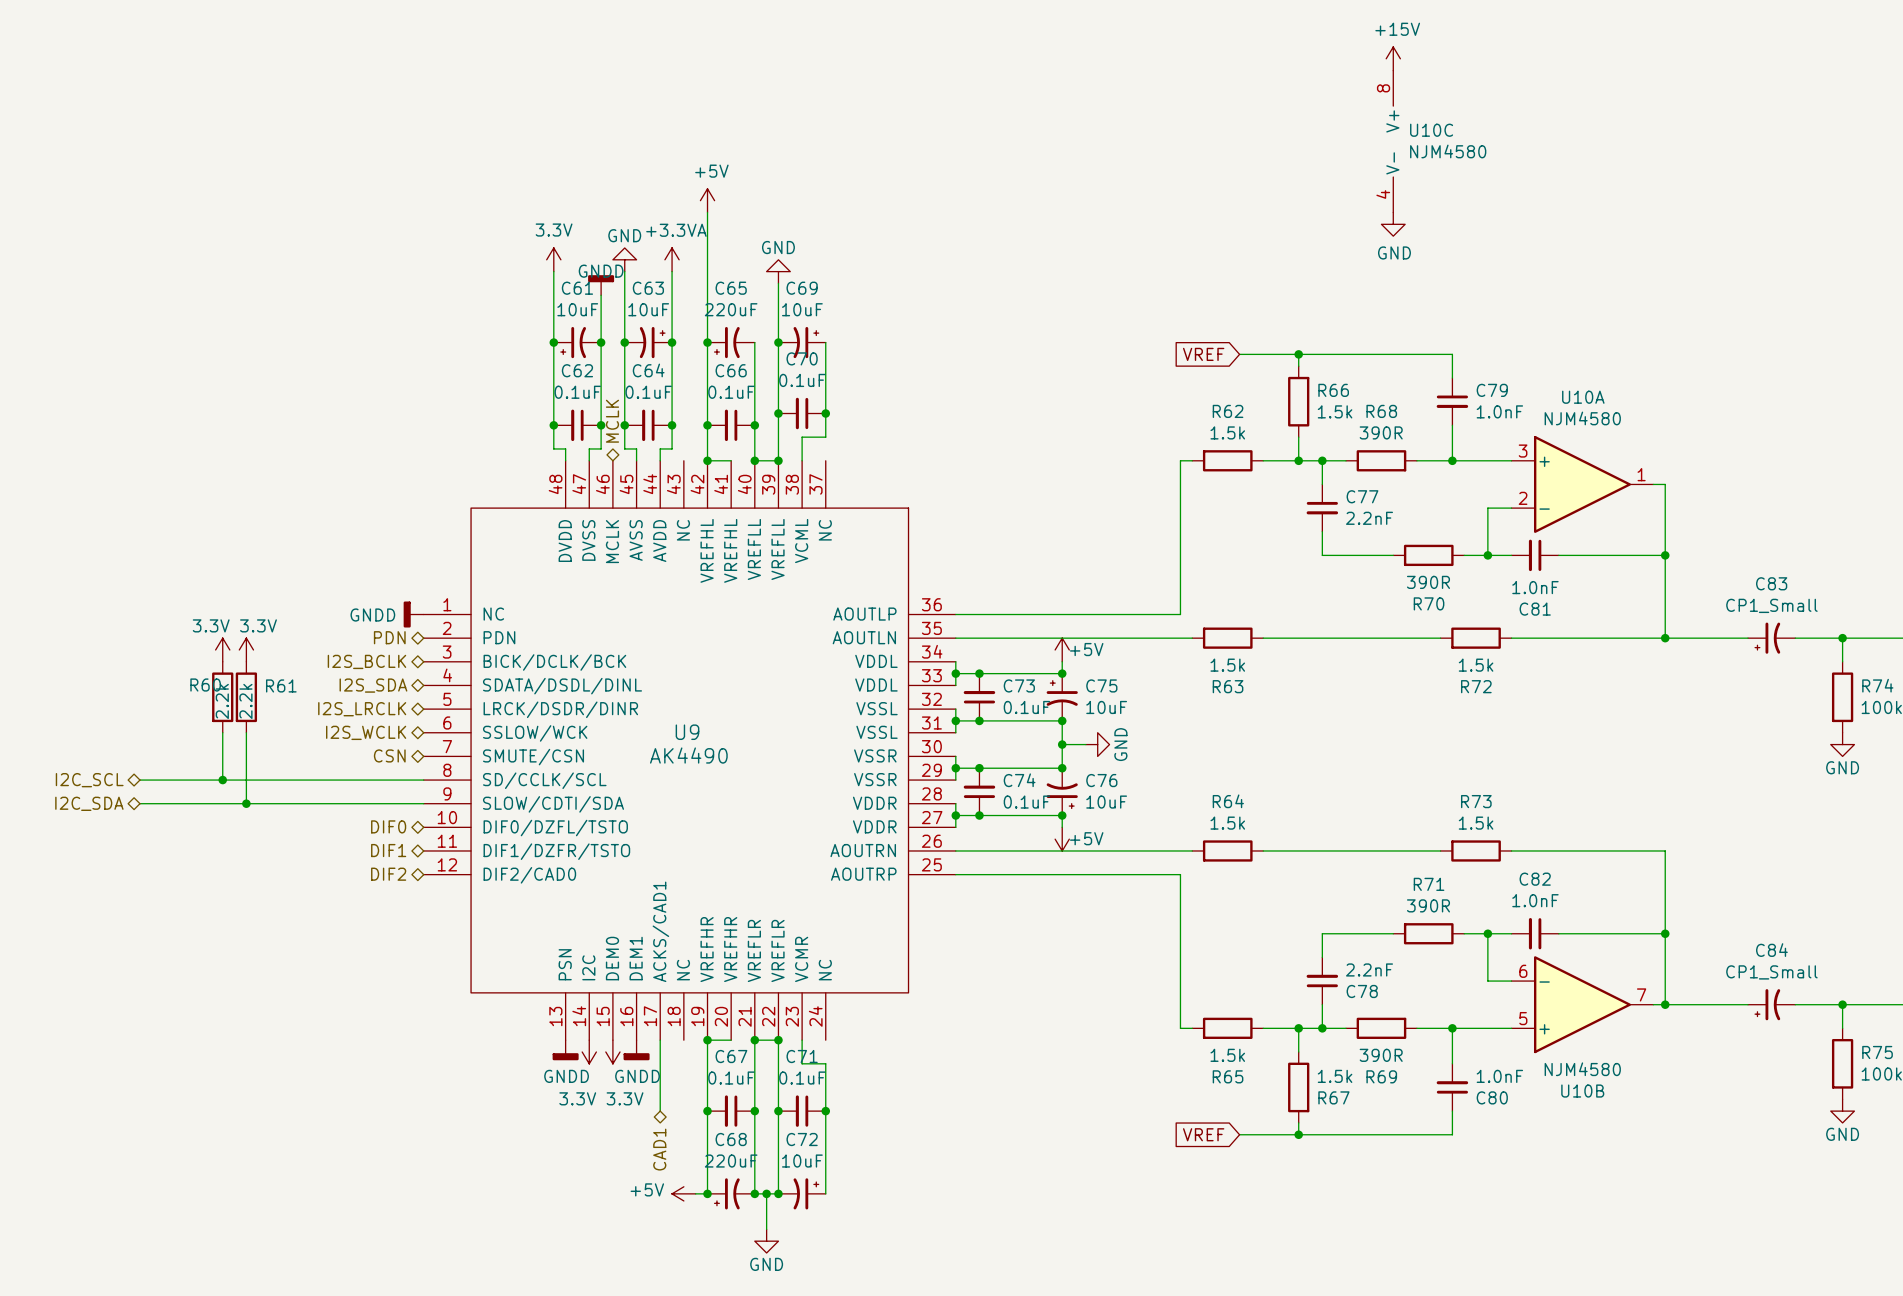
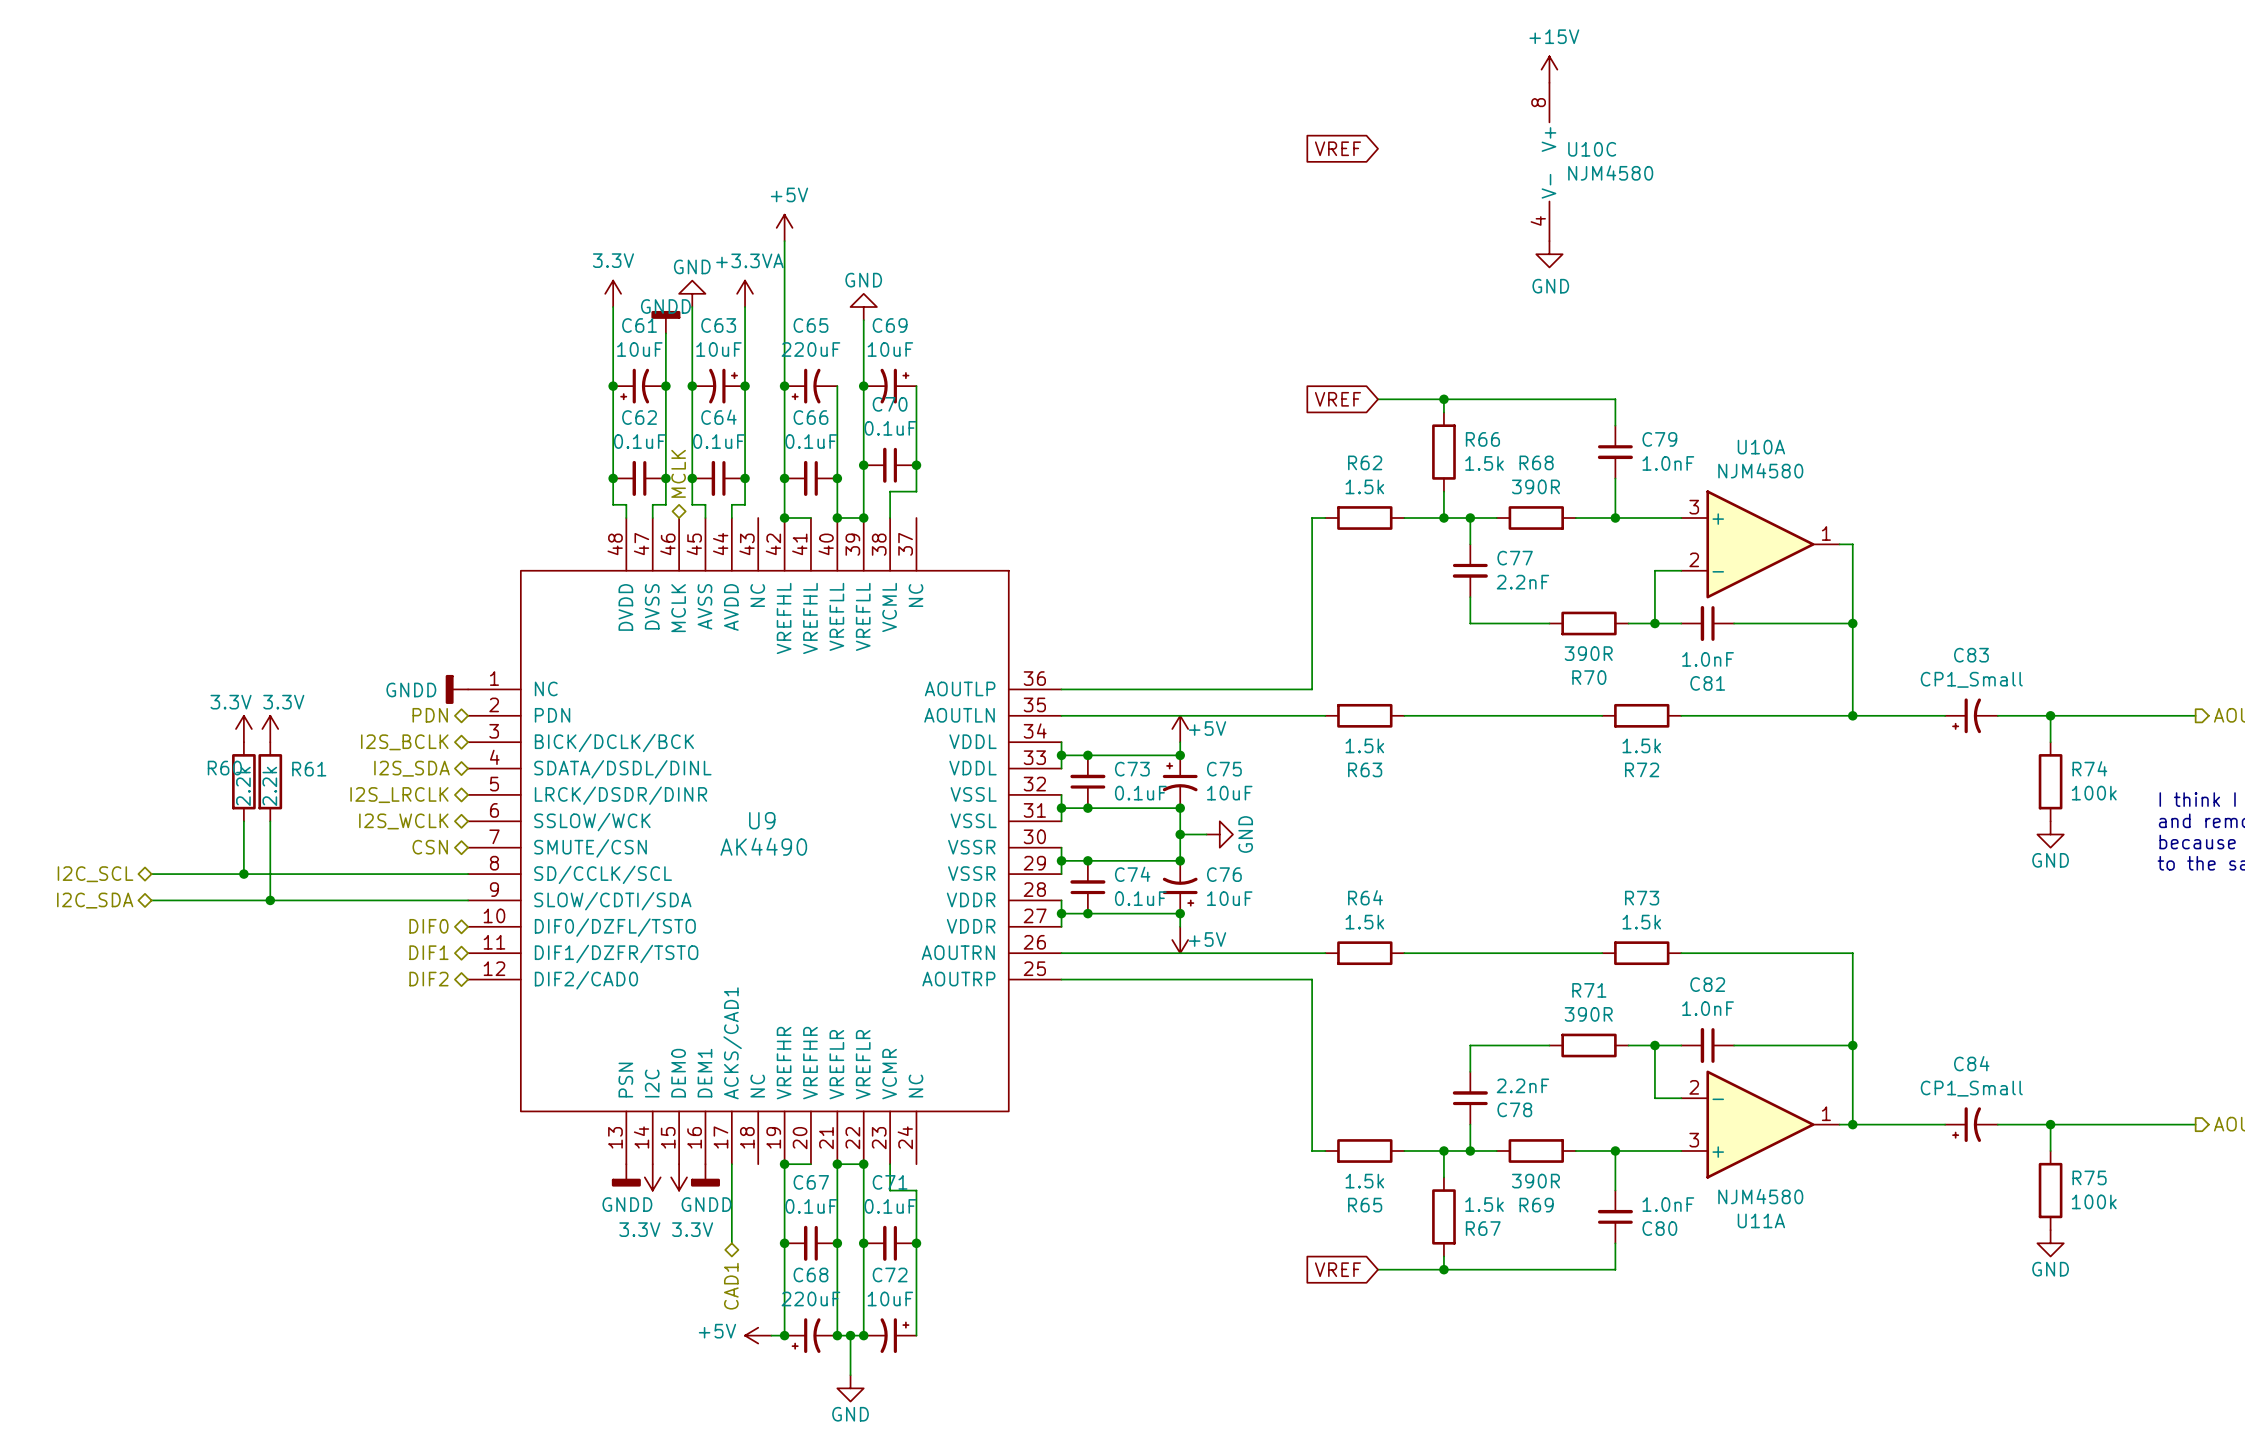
global label: none -> VREF (1337, 148)
U10B pin number: 6 (1523, 971) -> 2 (1694, 1087)
U10B pin number: 7 (1641, 994) -> 1 (1826, 1113)
U10B pin number: 5 (1523, 1018) -> 3 (1694, 1140)
U10B name: U10B (1582, 1091) -> U11A (1761, 1220)

